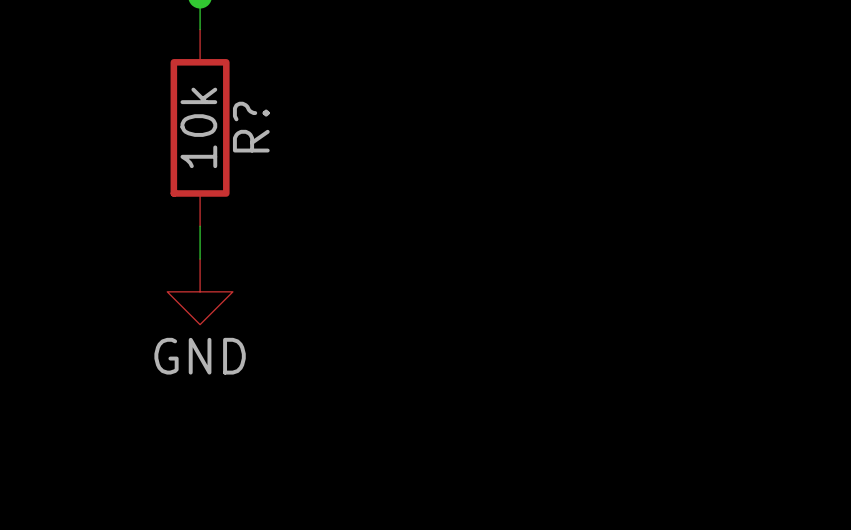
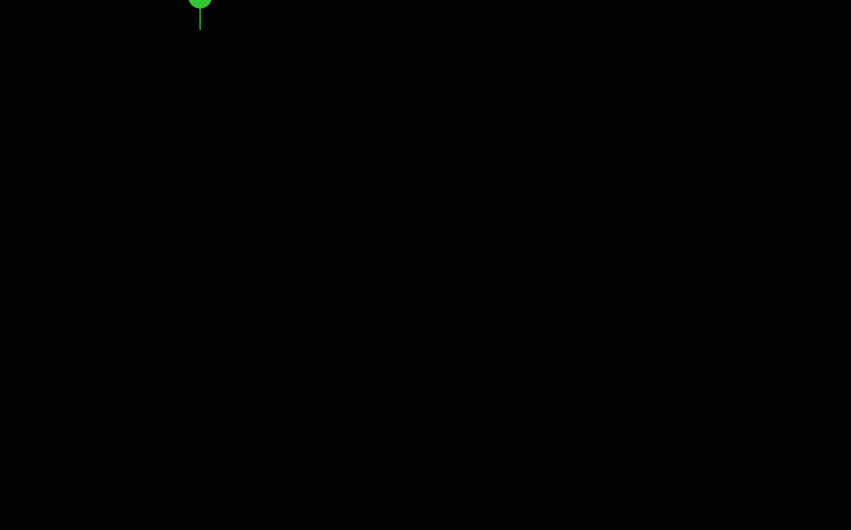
R?: 10k (200, 127) -> none
wire: (200, 226) (200, 259) -> none
power symbol: GND (200, 291) -> none

